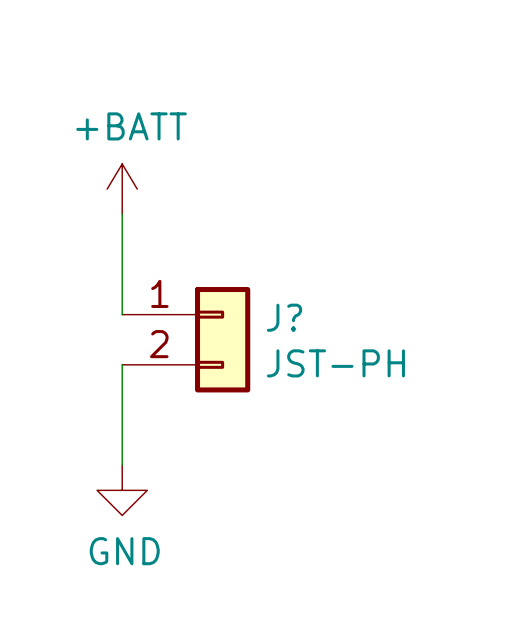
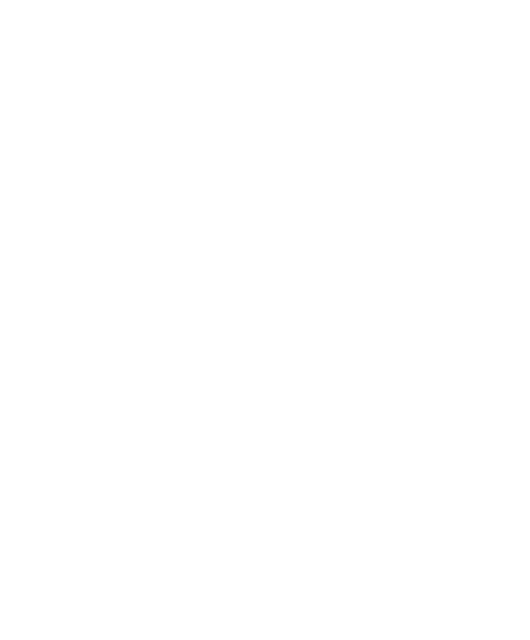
power symbol: +BATT (122, 189) -> none
wire: (122, 214) (122, 314) -> none
J?: JST-PH (186, 339) -> none
wire: (122, 364) (122, 465) -> none
power symbol: GND (122, 490) -> none

